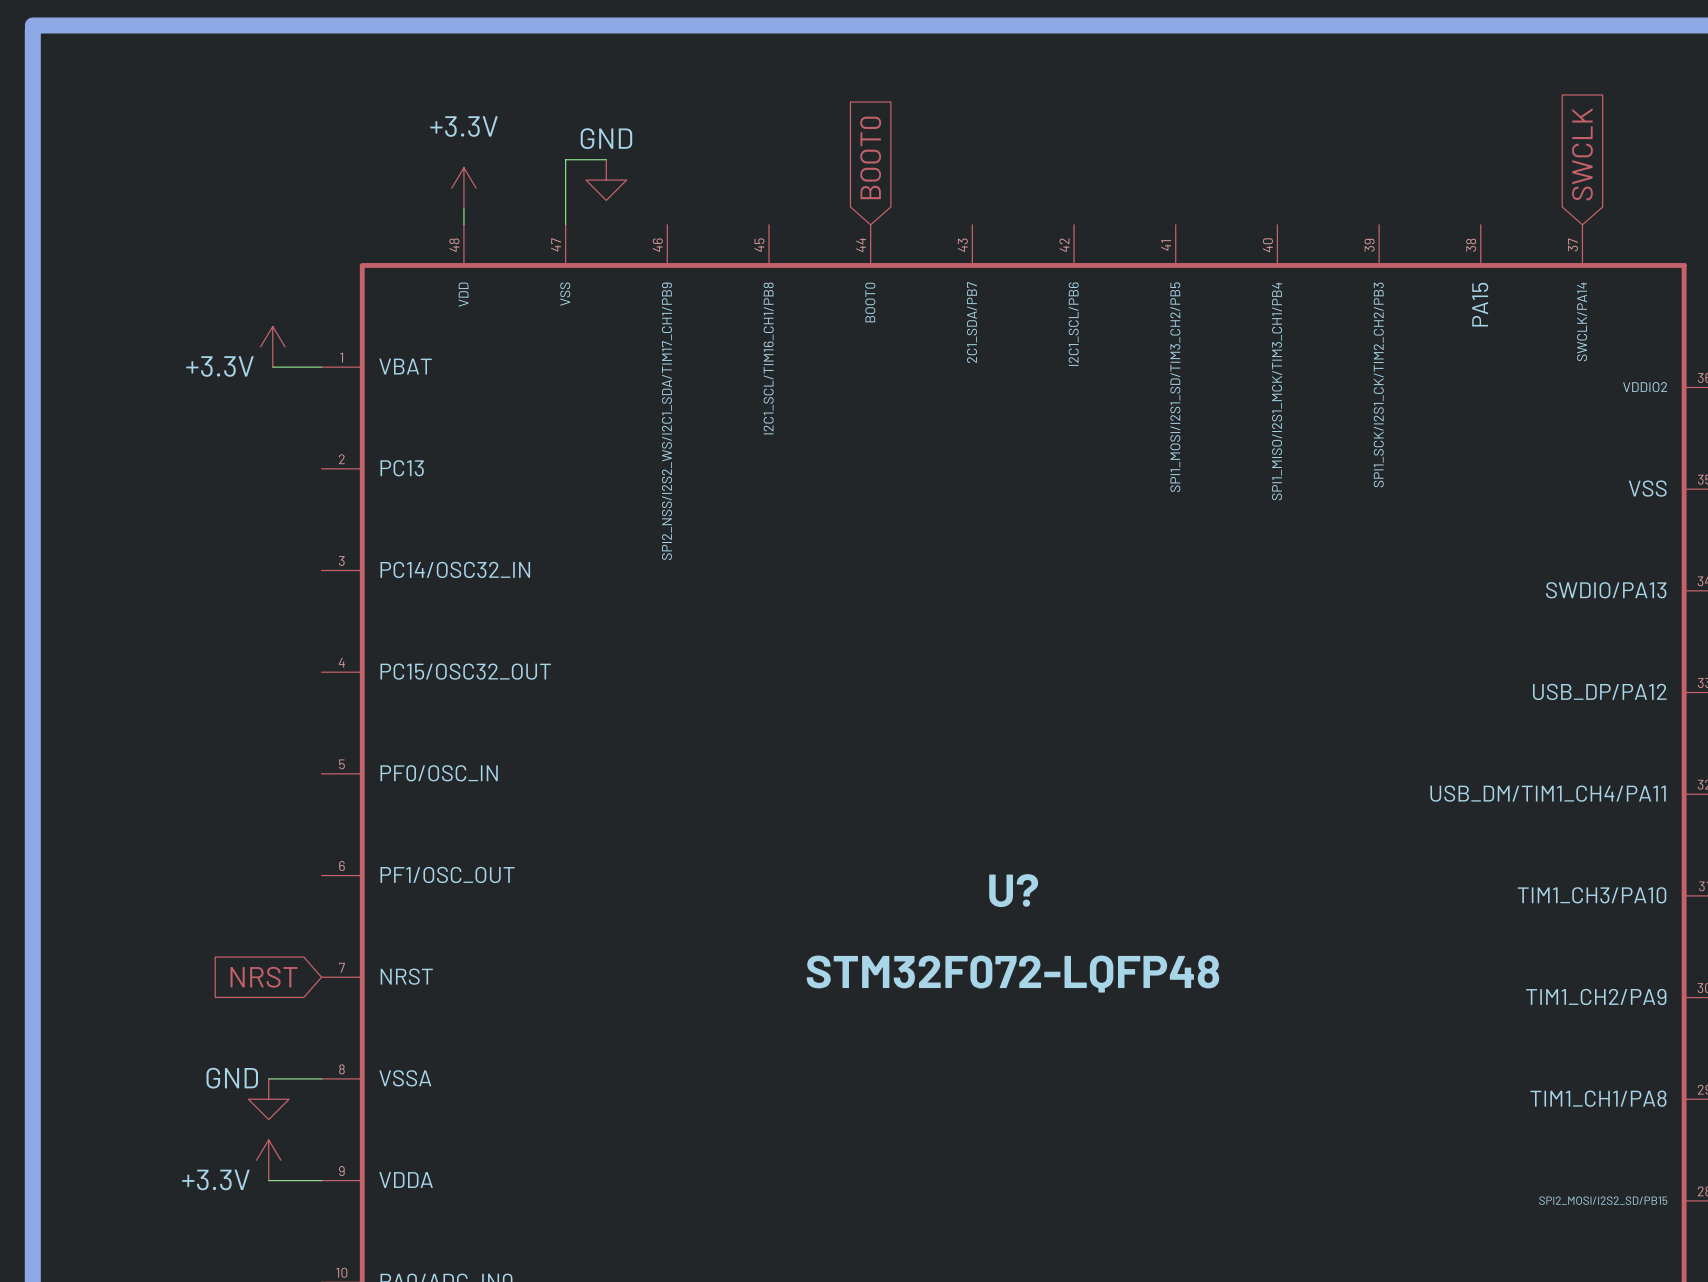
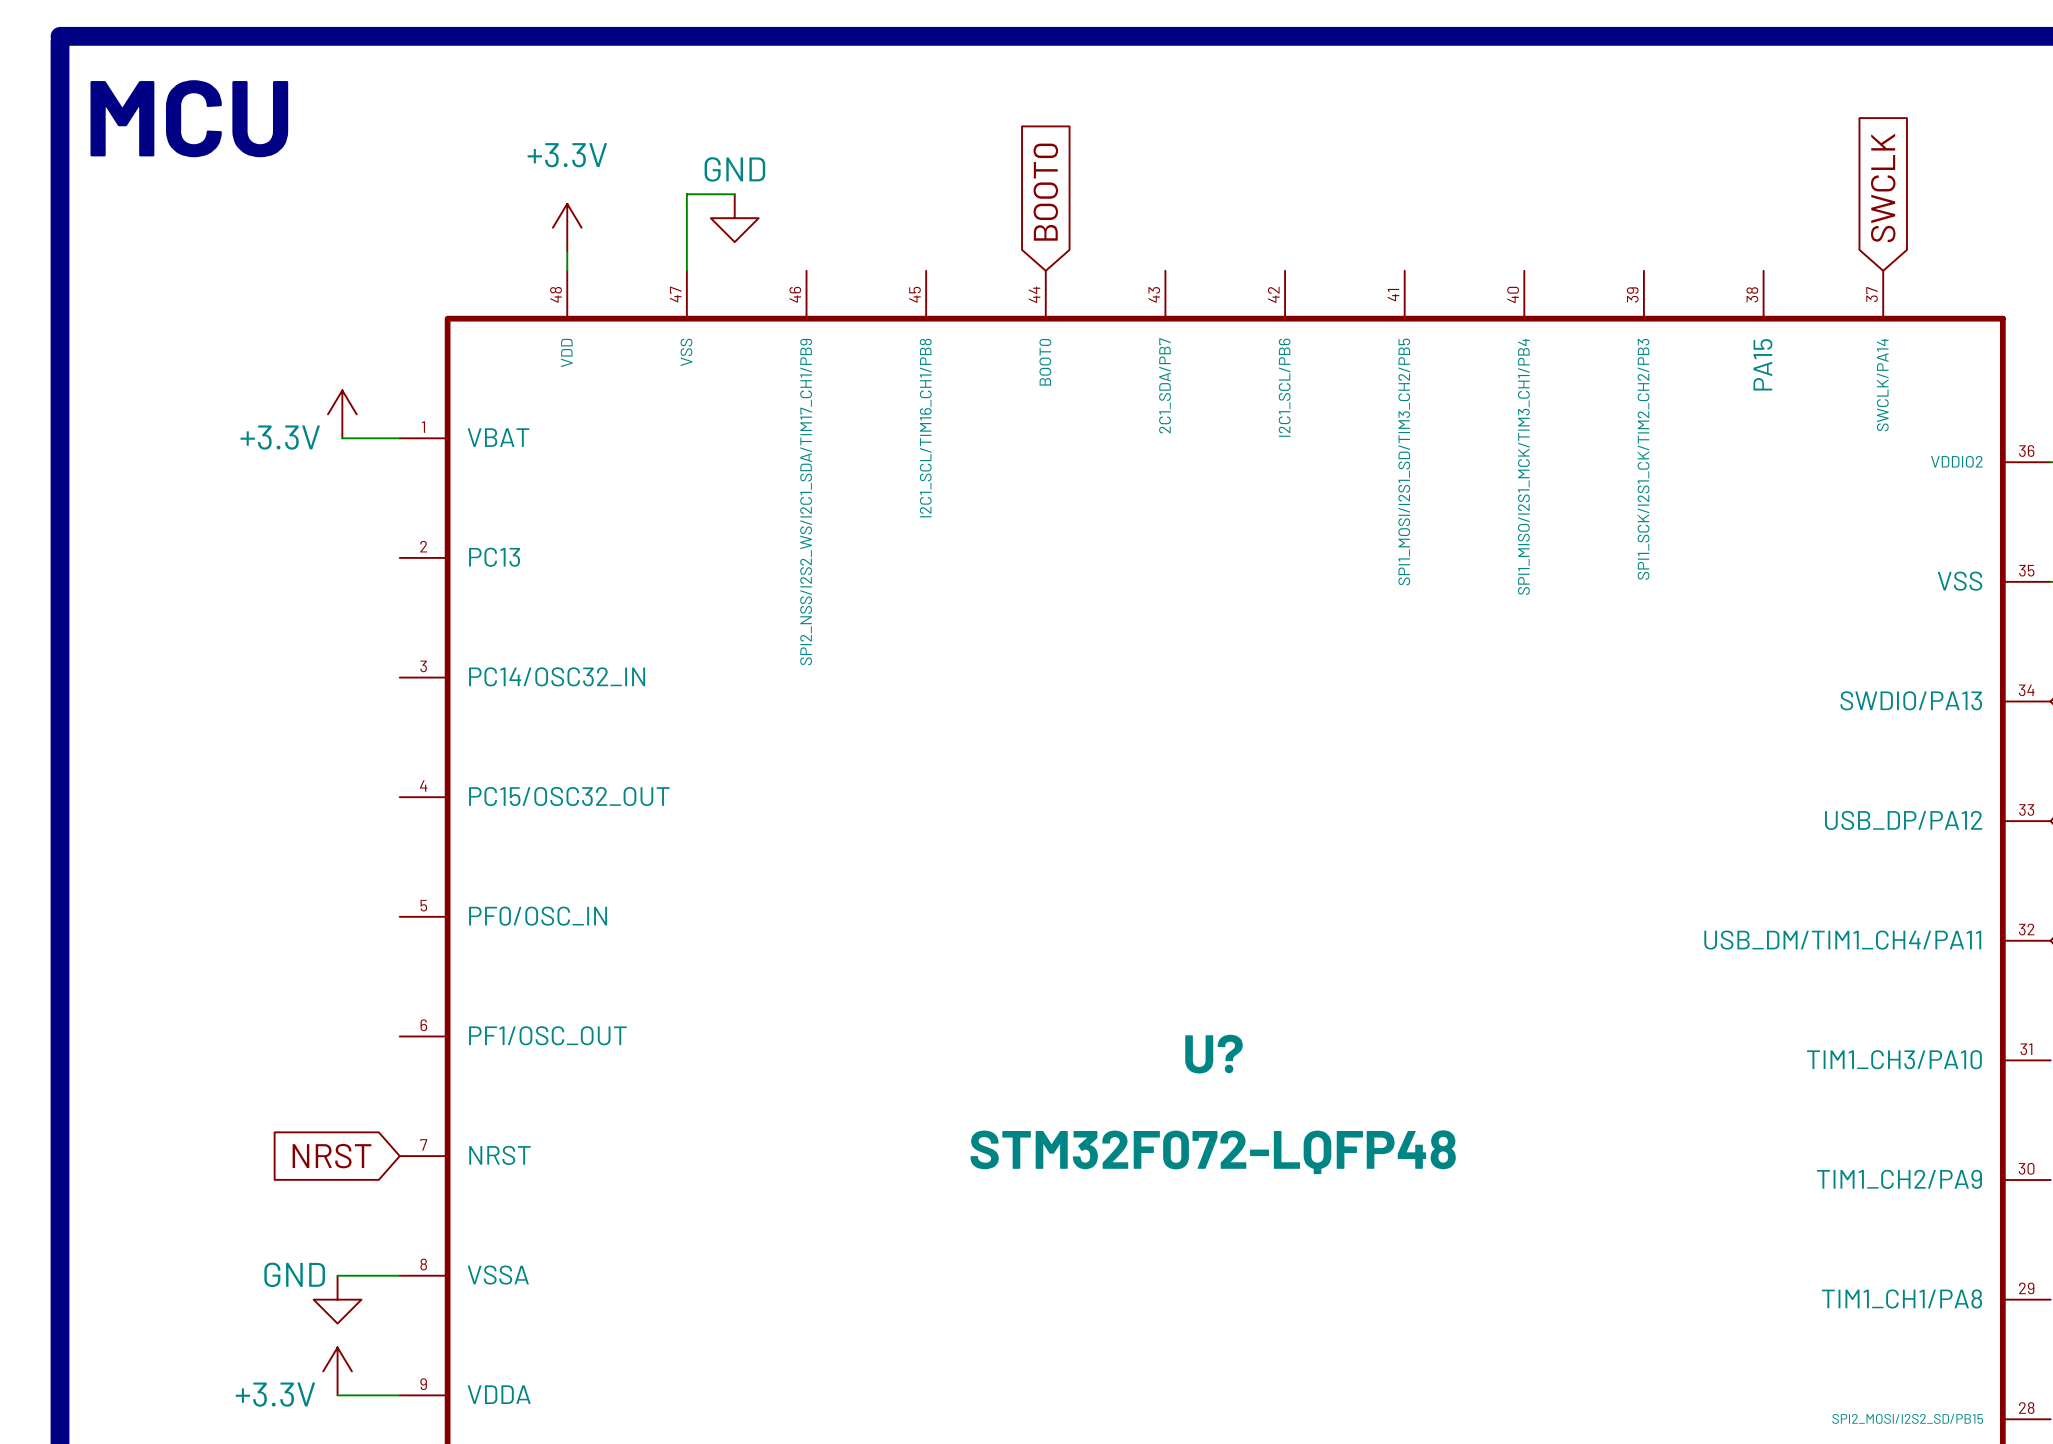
text: none -> MCU (189, 118)

